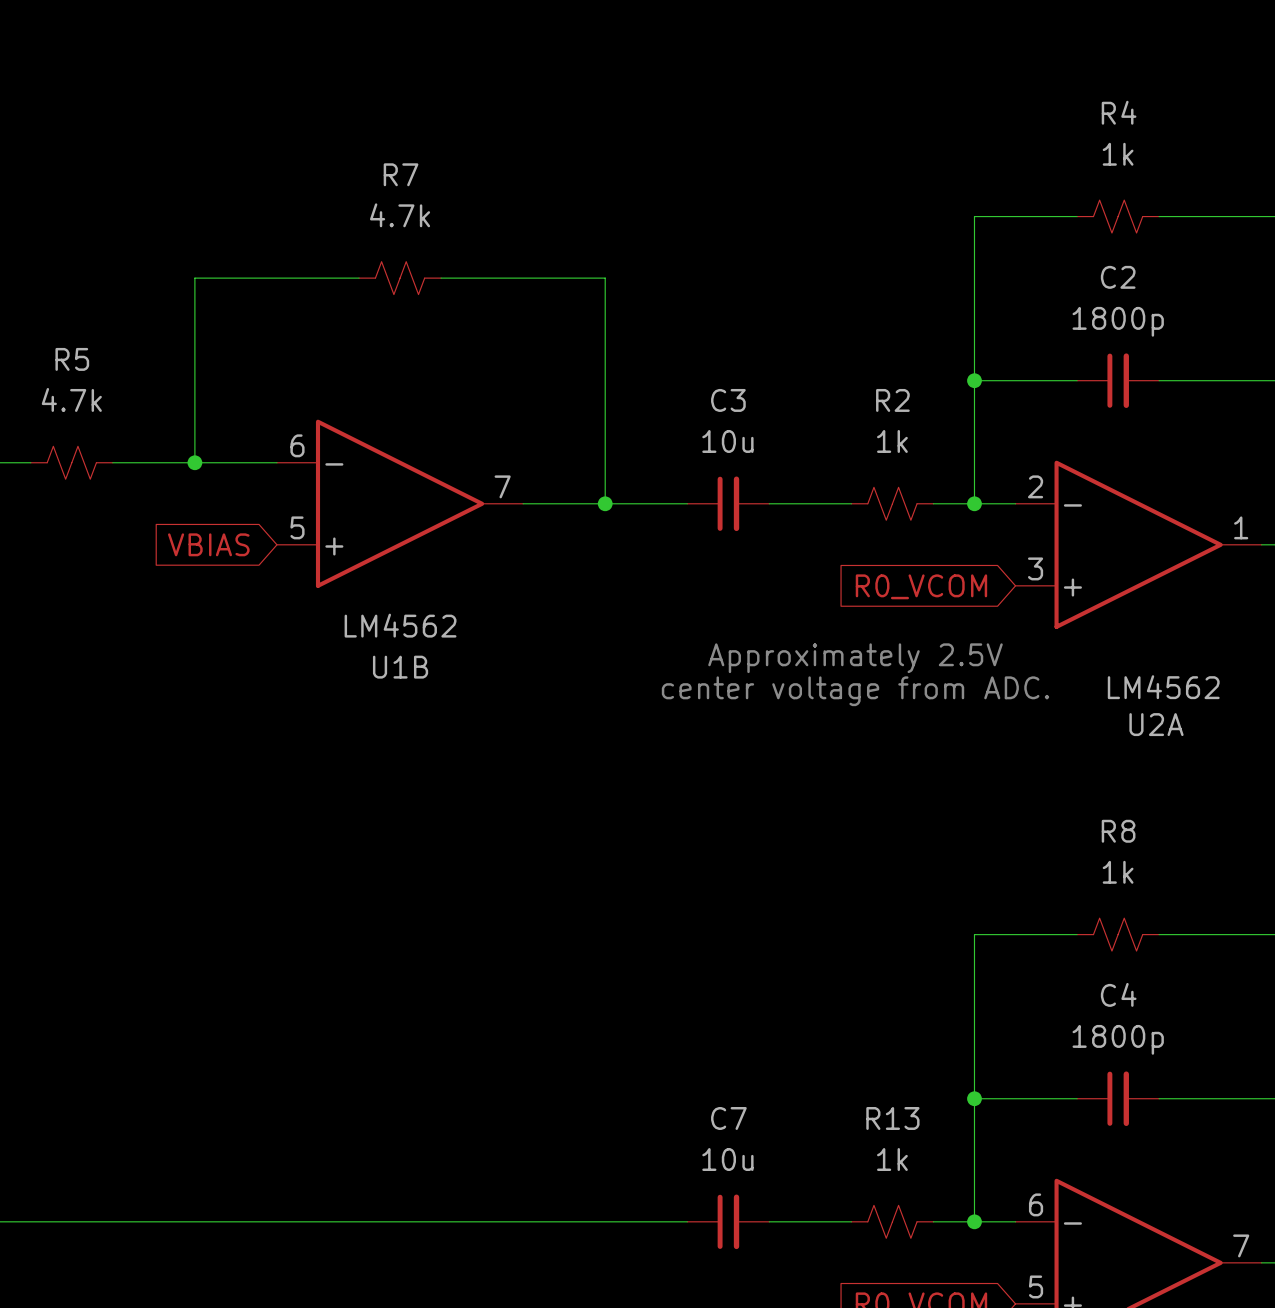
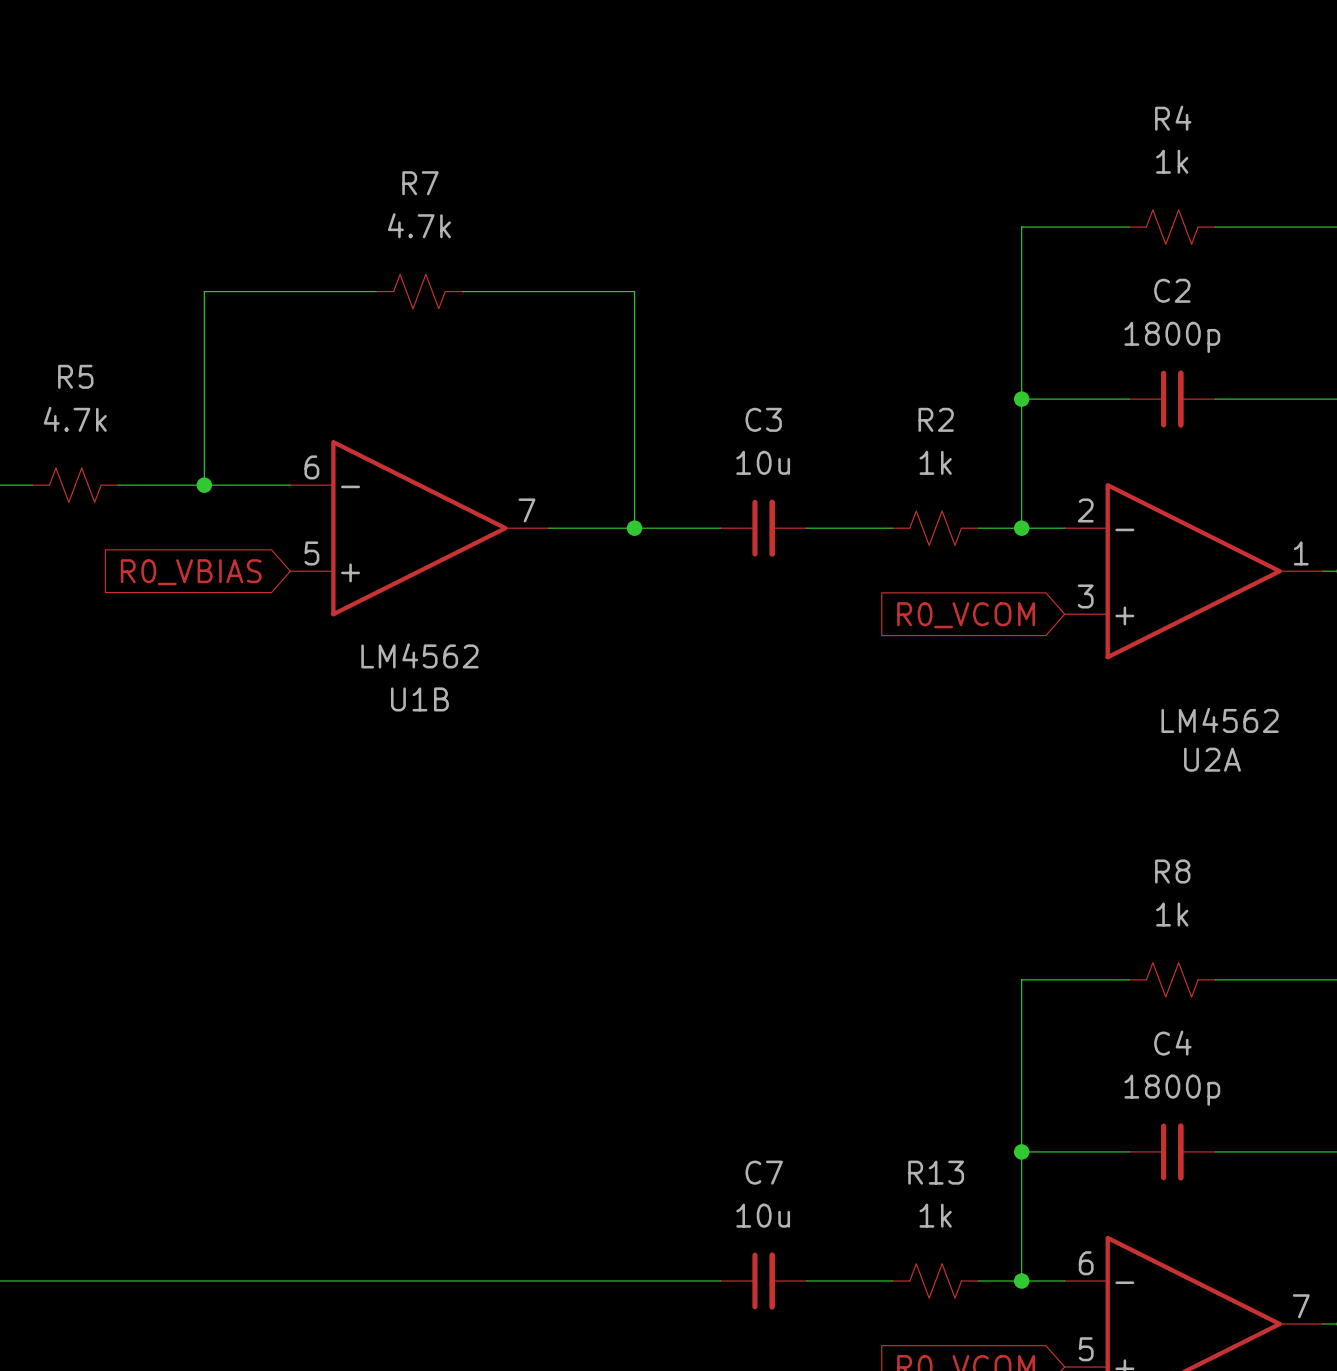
global label: VBIAS (208, 544) -> R0_VBIAS (191, 572)
text: Approximately 2.5V (855, 658) -> none
text: center voltage from ADC. (855, 691) -> none

